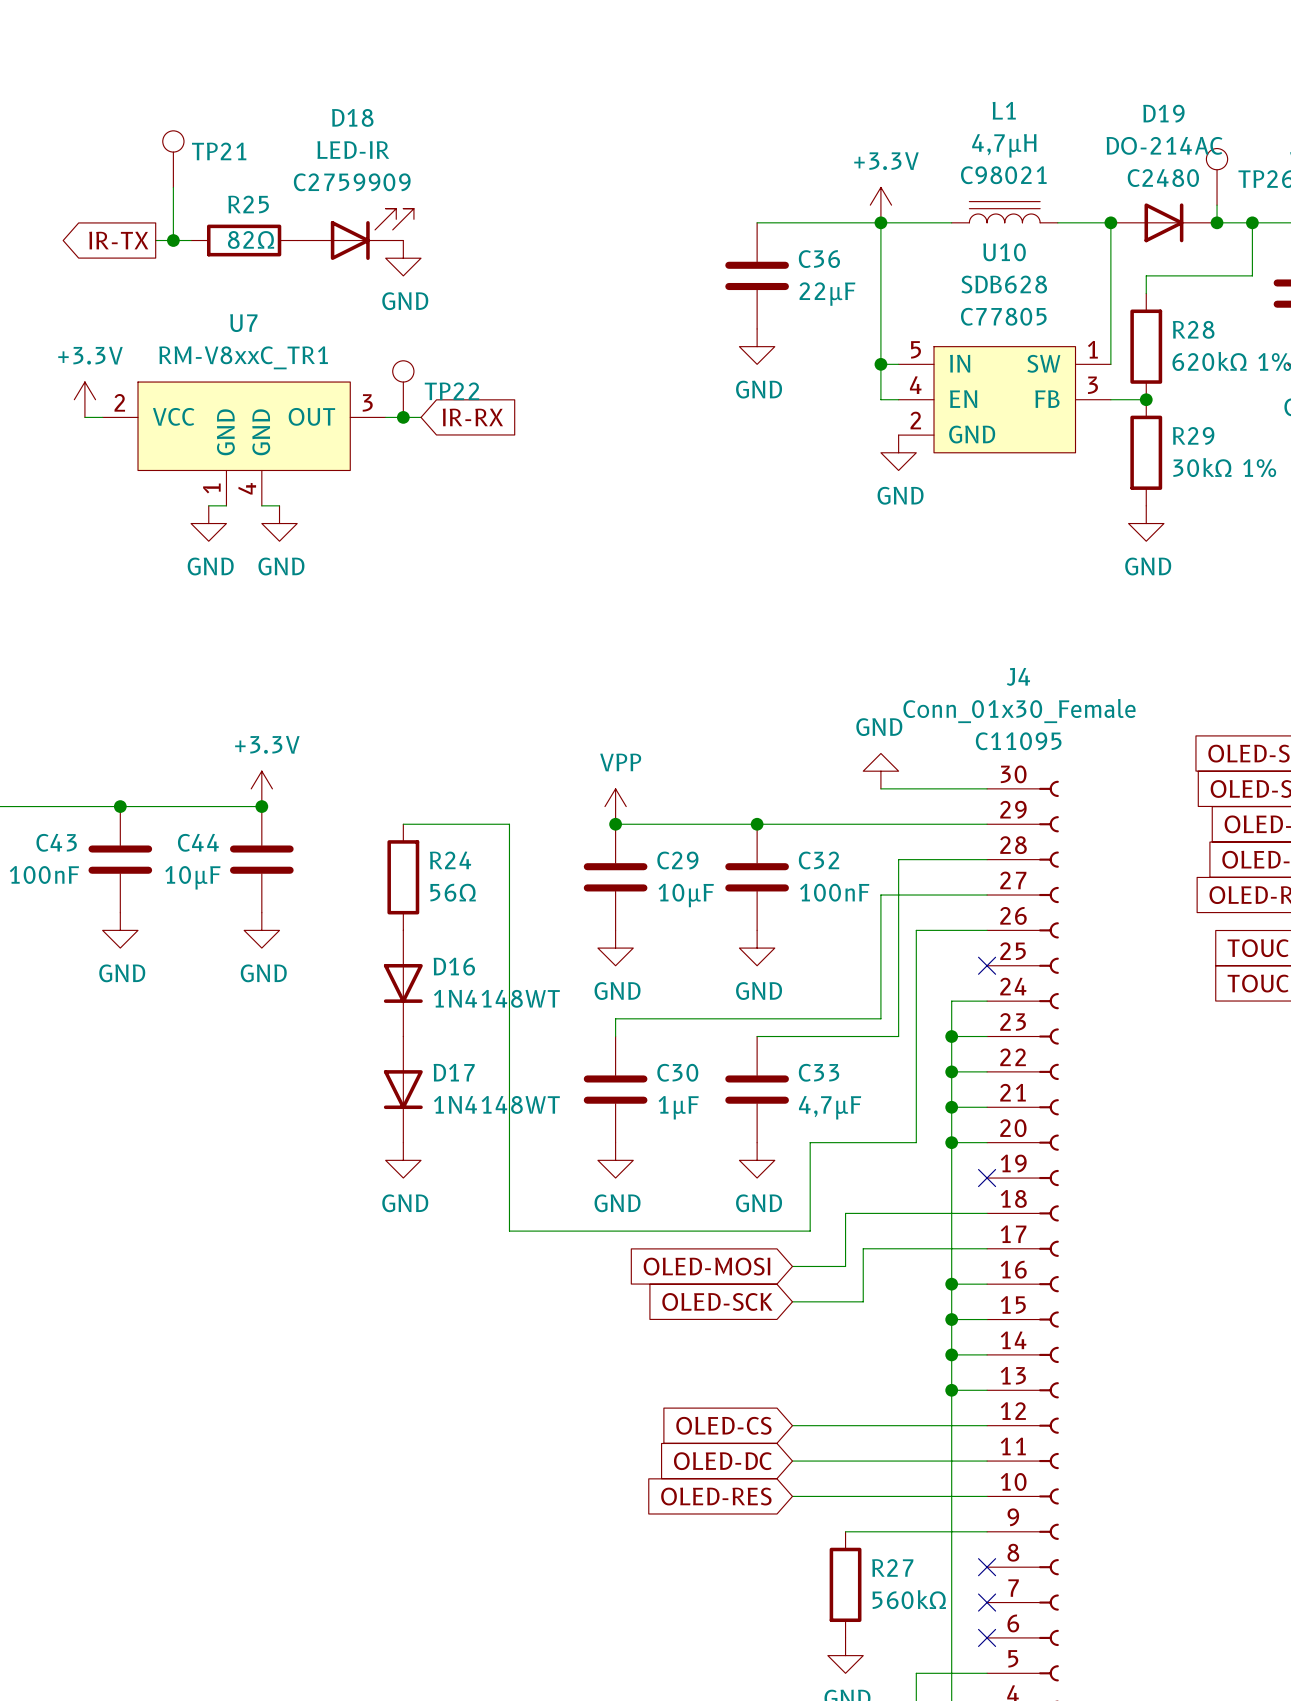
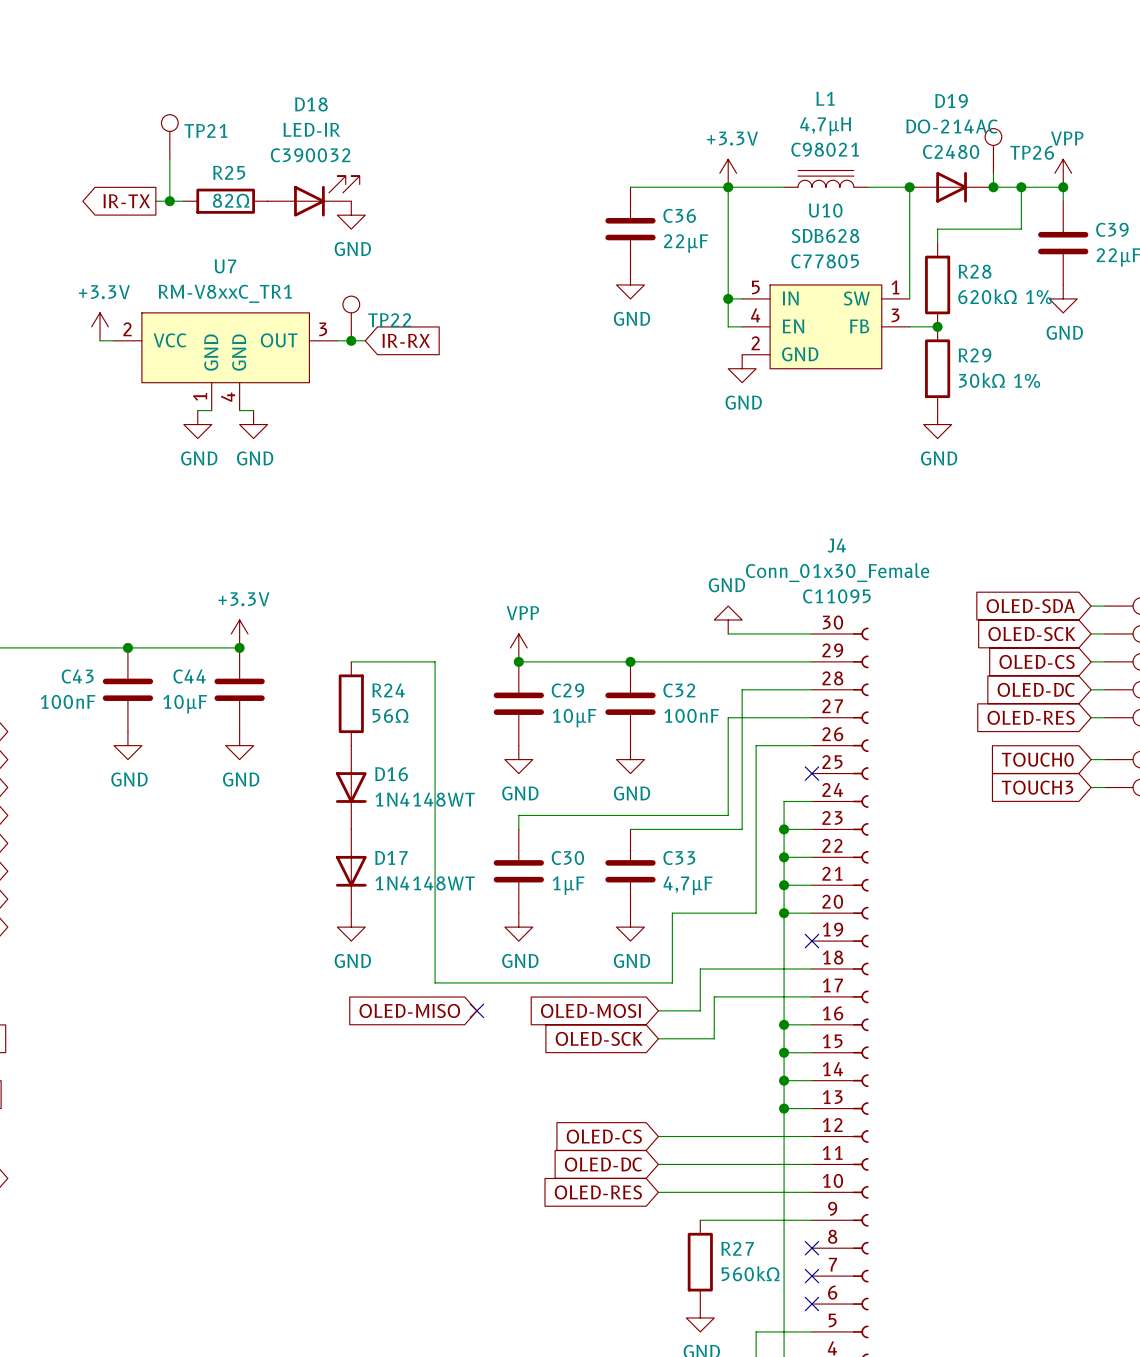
D18 text: C2759909 (352, 182) -> C390032 (310, 155)
global label: none -> OLED-MISO (409, 1010)
no-connect mark: none -> (476, 1010)

